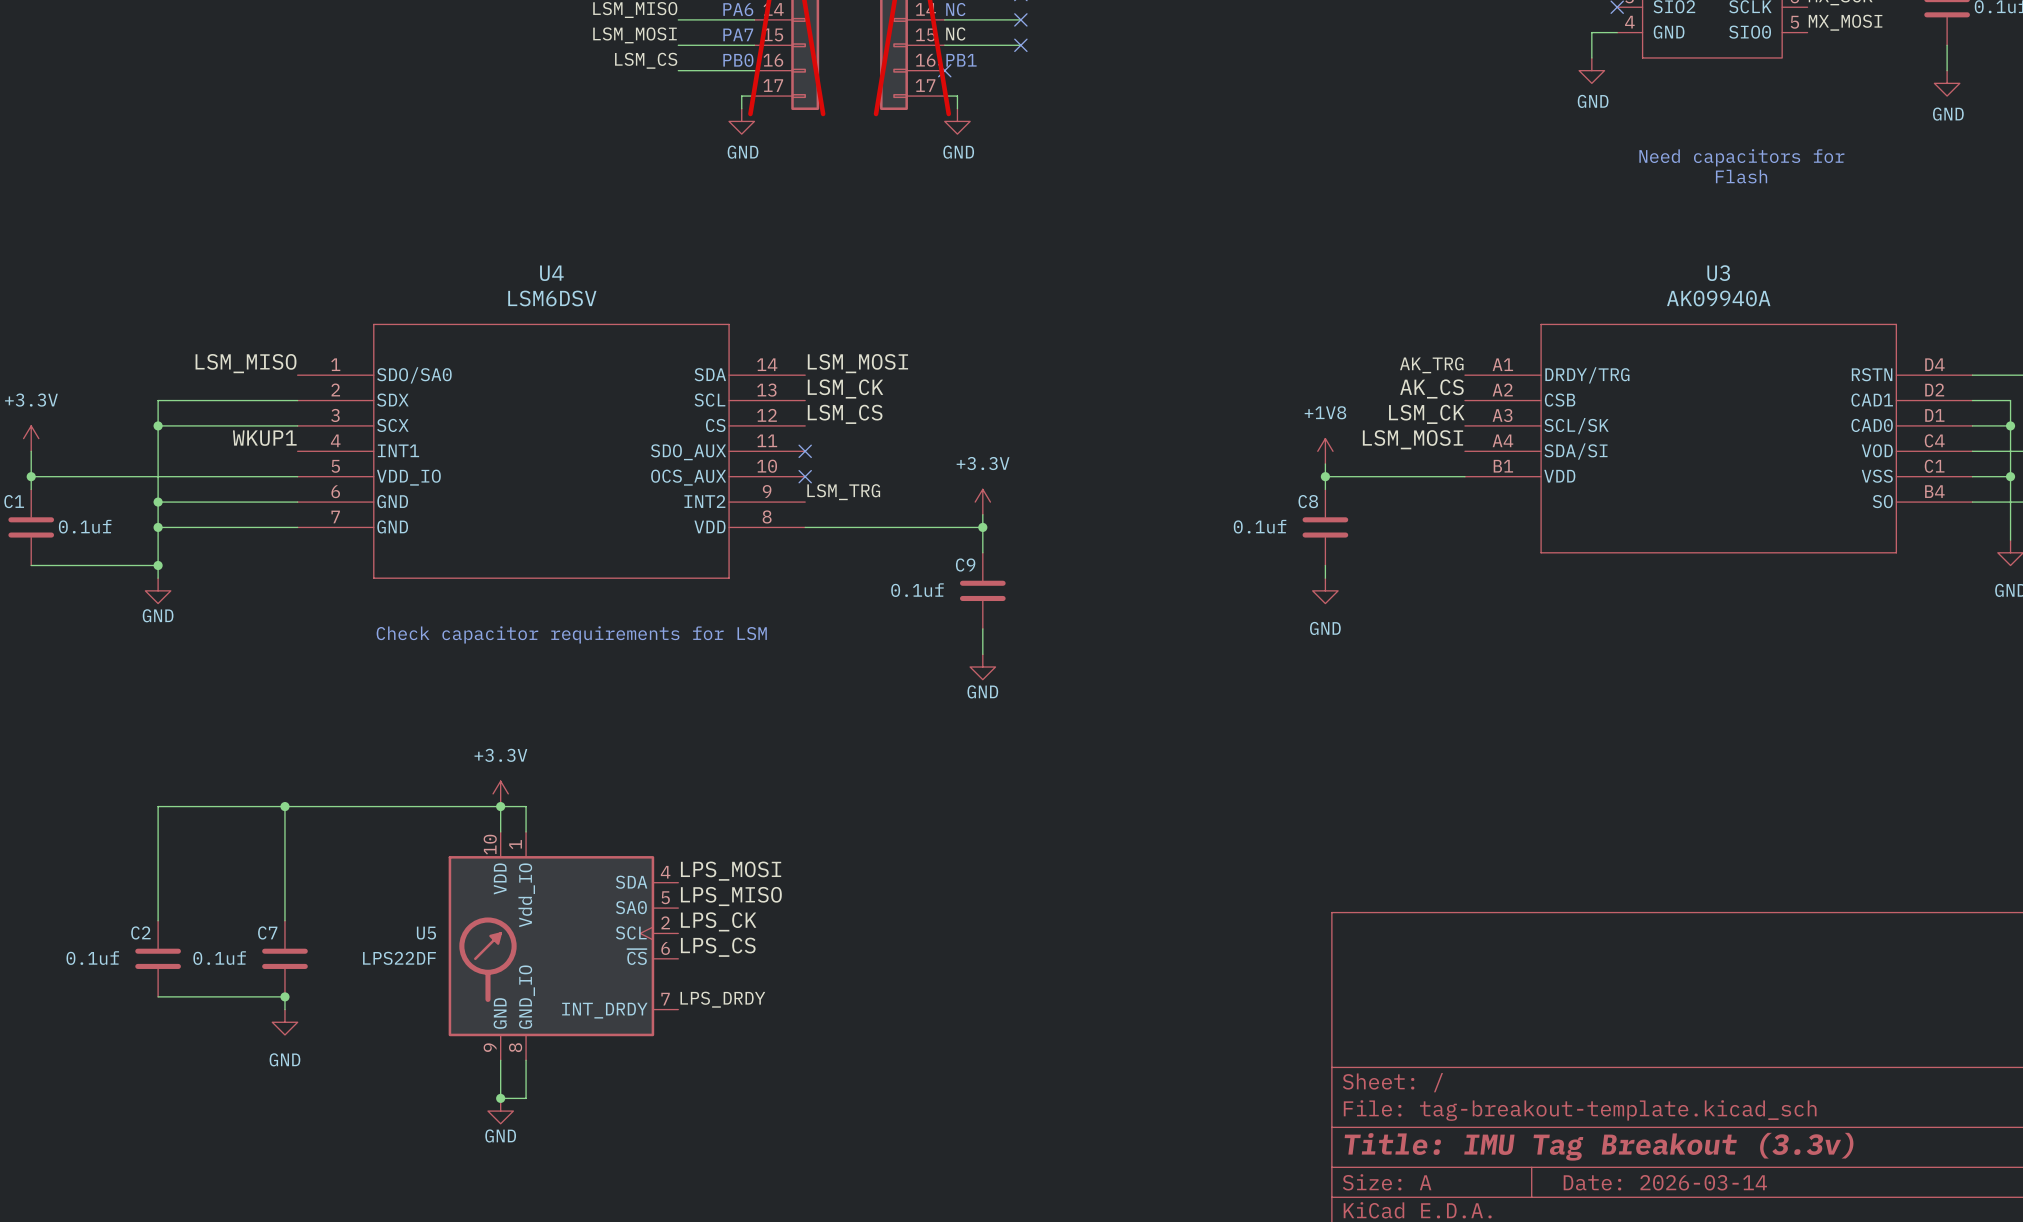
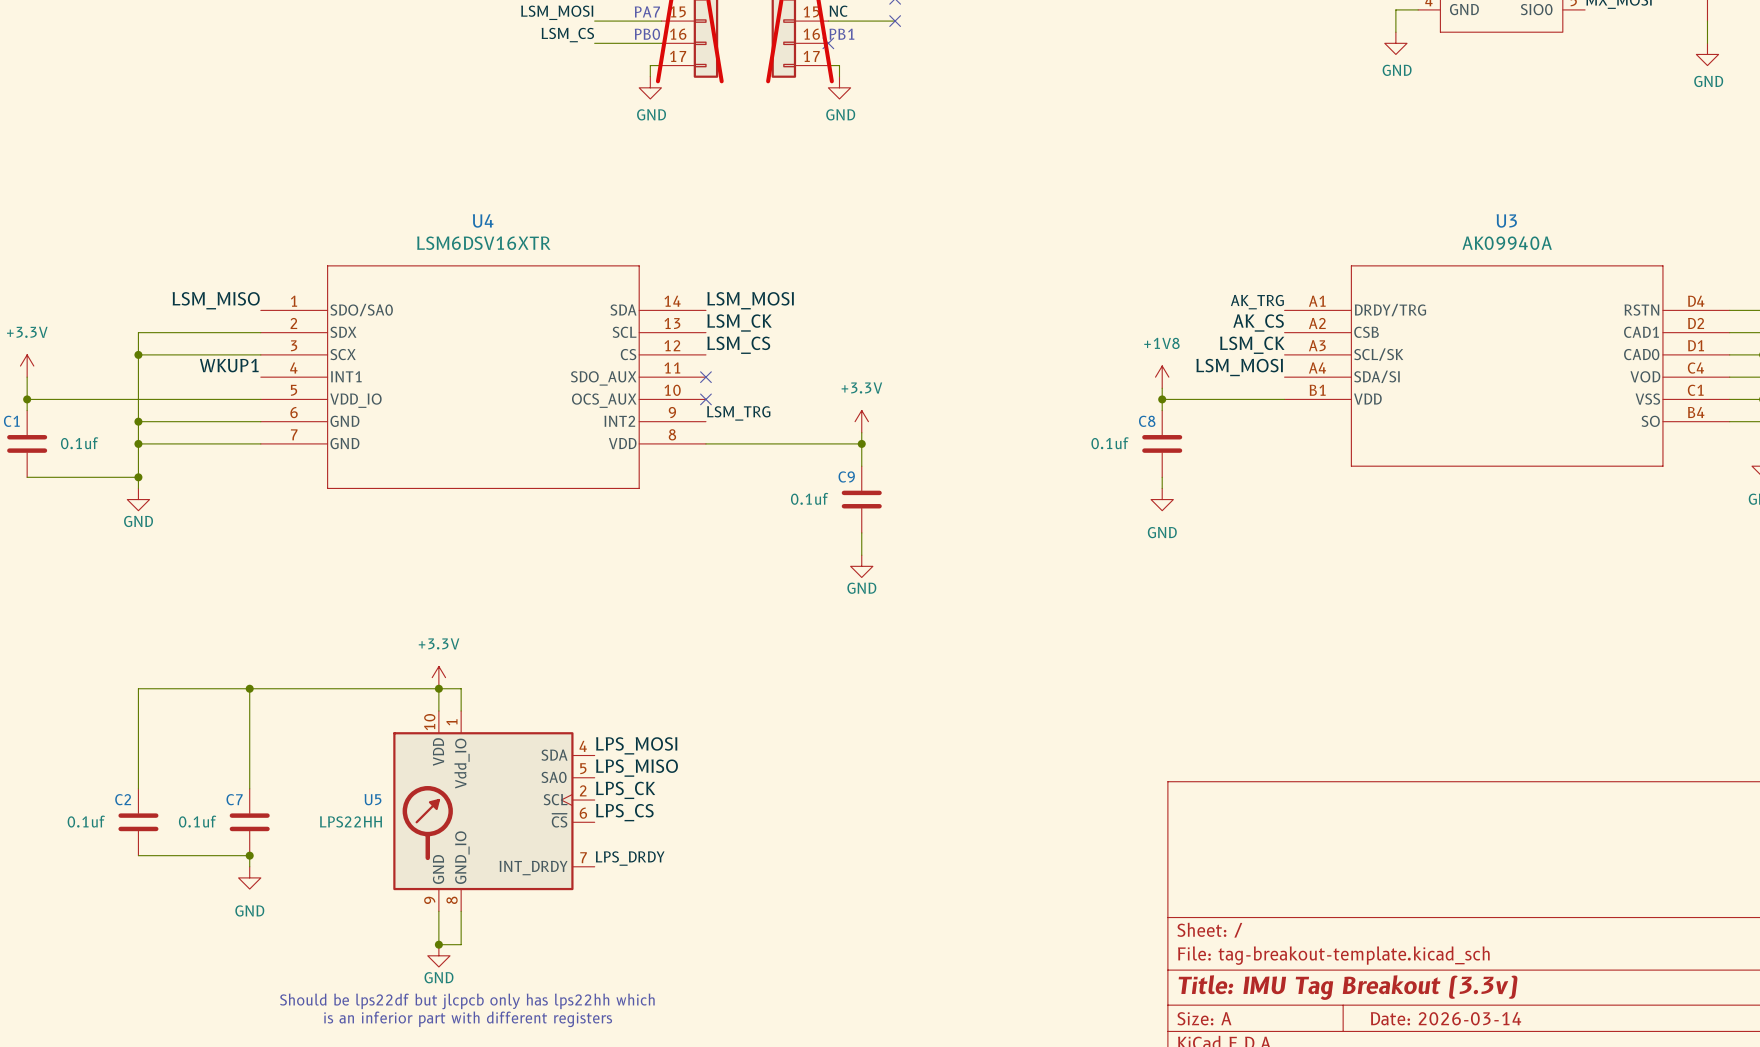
text: Need capacitors for (1741, 157) -> none
text: Flash (1741, 176) -> none
U4 value: LSM6DSV (552, 298) -> LSM6DSV16XTR (483, 243)
text: Check capacitor requirements for LSM (571, 634) -> none
U5 value: LPS22DF (399, 958) -> LPS22HH (350, 821)
text: none -> Should be lps22df but jlcpcb only has lps22hh which (467, 1001)
text: none -> is an inferior part with different registers (468, 1019)

